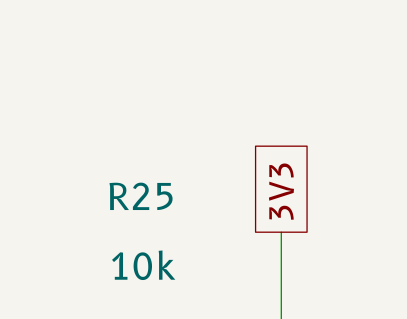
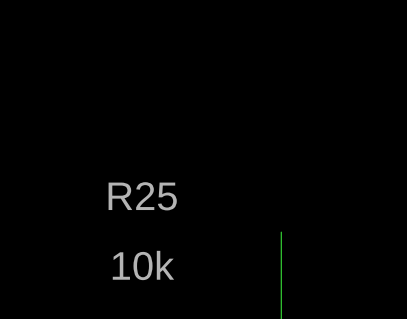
global label: 3V3 (281, 191) -> none

